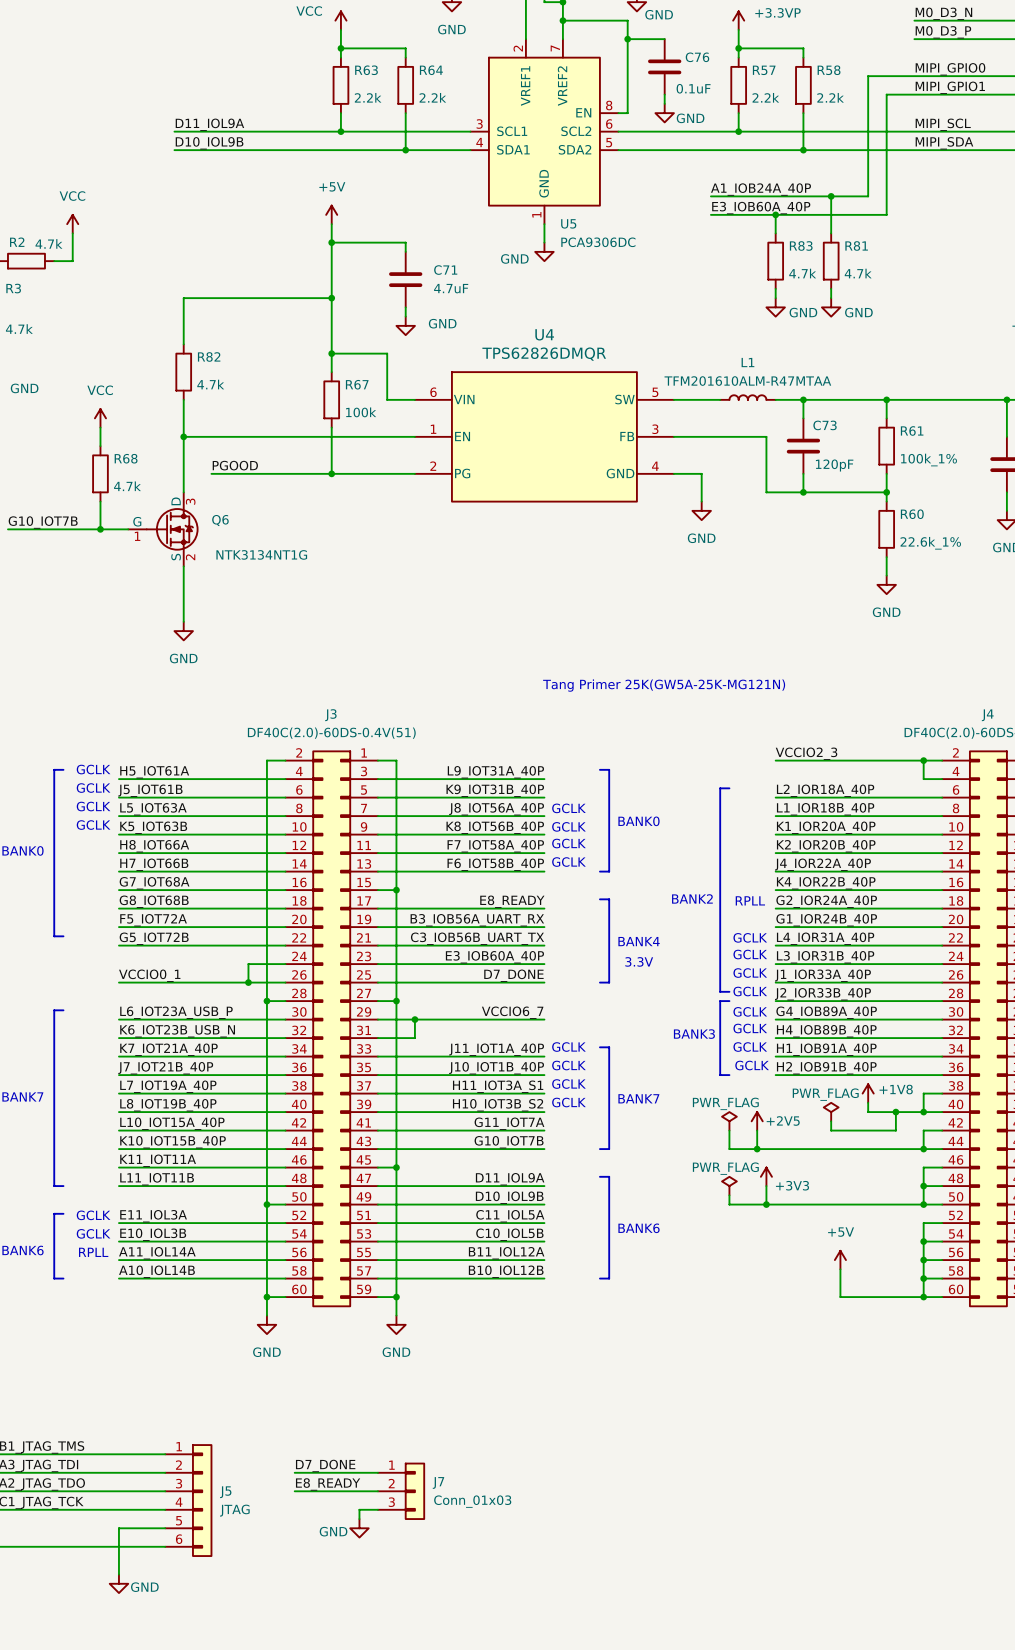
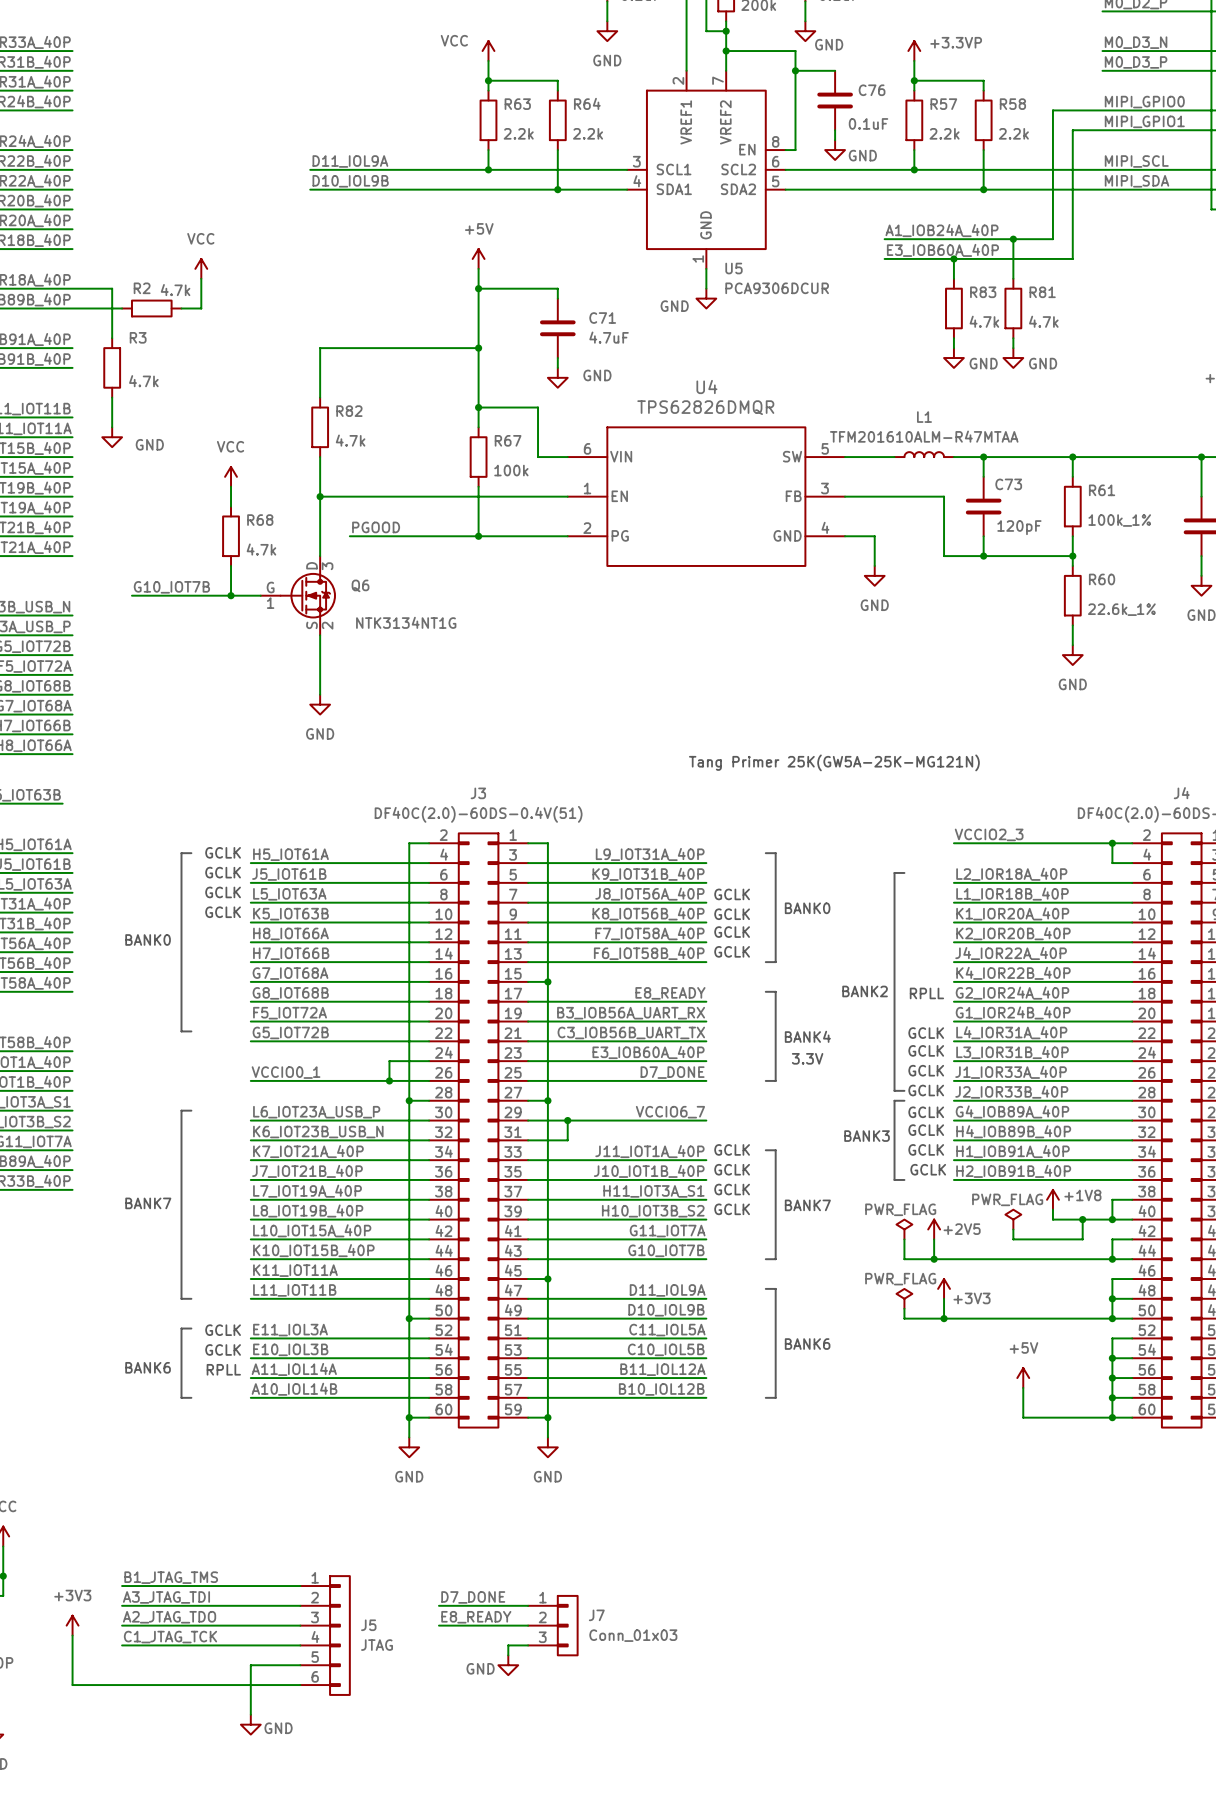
U5 value: PCA9306DC (598, 242) -> PCA9306DCUR (777, 288)

